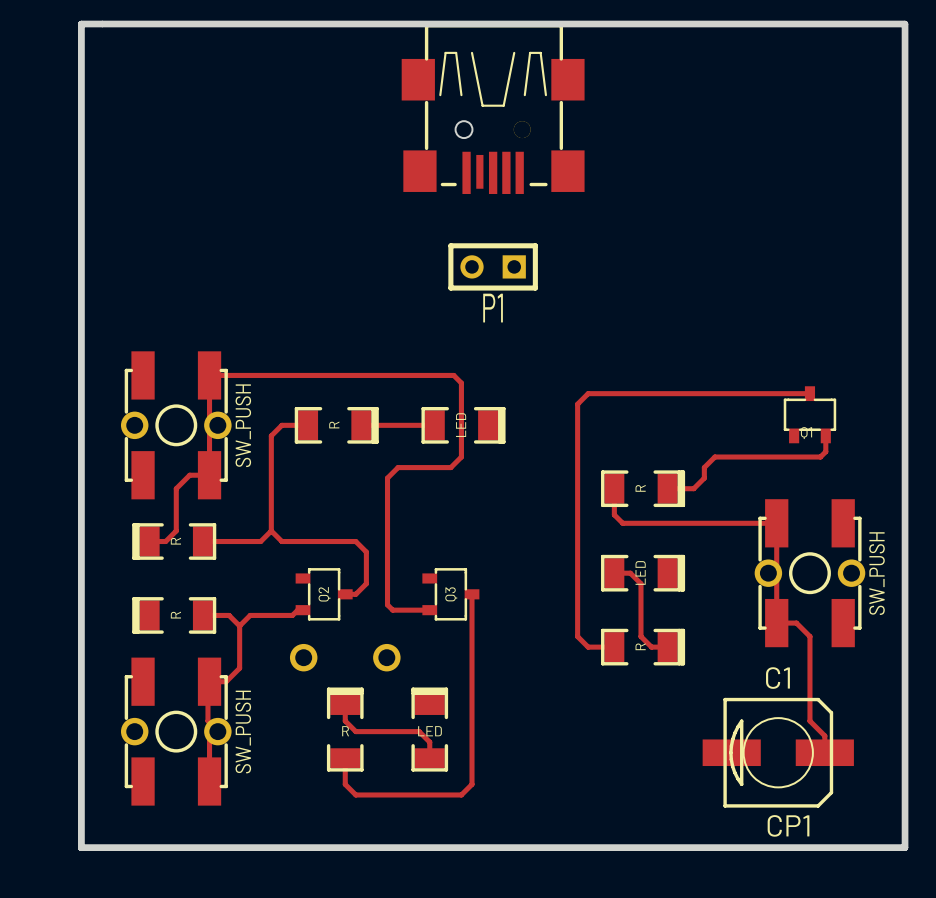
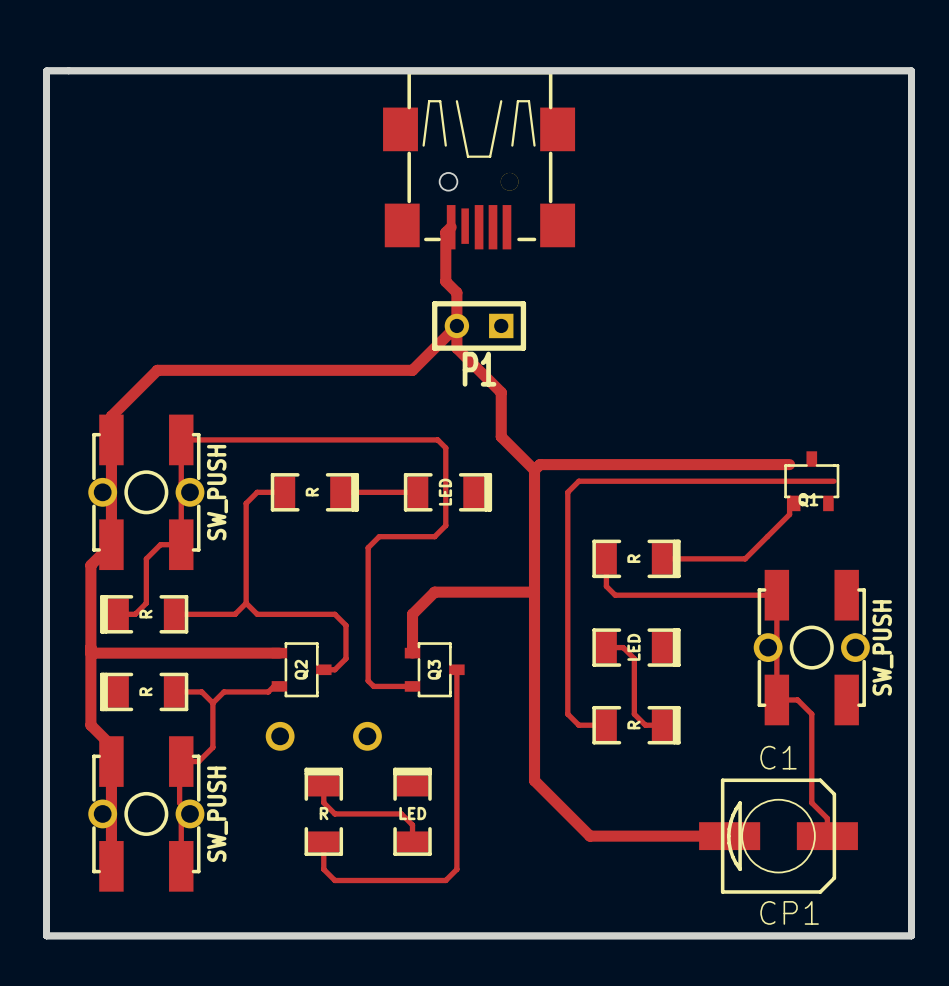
track: none -> (451, 227) (445, 232) (445, 281) (456, 292) (456, 348) (501, 392) (501, 436) (534, 470)
track: none -> (456, 325) (412, 370) (157, 370) (111, 416) (111, 544) (90, 565) (90, 725) (111, 745) (111, 866)
track: (809, 393) (588, 393) (577, 404) (577, 425) -> (833, 481) (578, 481) (567, 492)
track: none -> (789, 464) (540, 464) (534, 470)
track: none -> (534, 470) (534, 780) (589, 836) (729, 836)
track: (825, 435) (825, 451) (820, 457) (714, 457) (704, 467) (704, 478) (693, 488) -> (789, 497) (789, 514) (745, 558) (689, 558)
track: none -> (534, 592) (434, 592) (412, 614) (412, 653)
track: none -> (90, 653) (279, 653)

